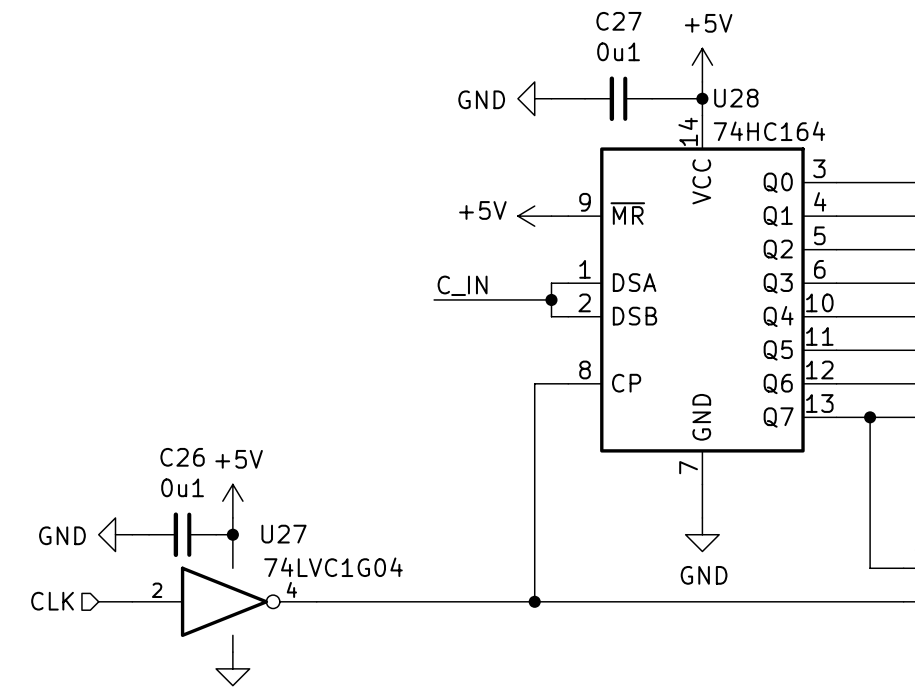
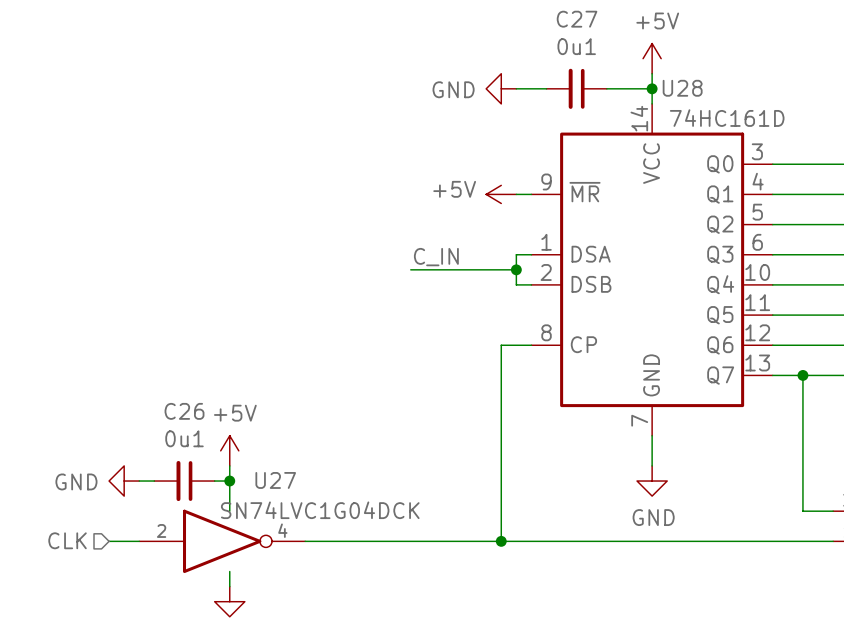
U28 value: 74HC164 (769, 131) -> 74HC161D (727, 118)
U27 value: 74LVC1G04 (333, 567) -> SN74LVC1G04DCK (320, 510)

